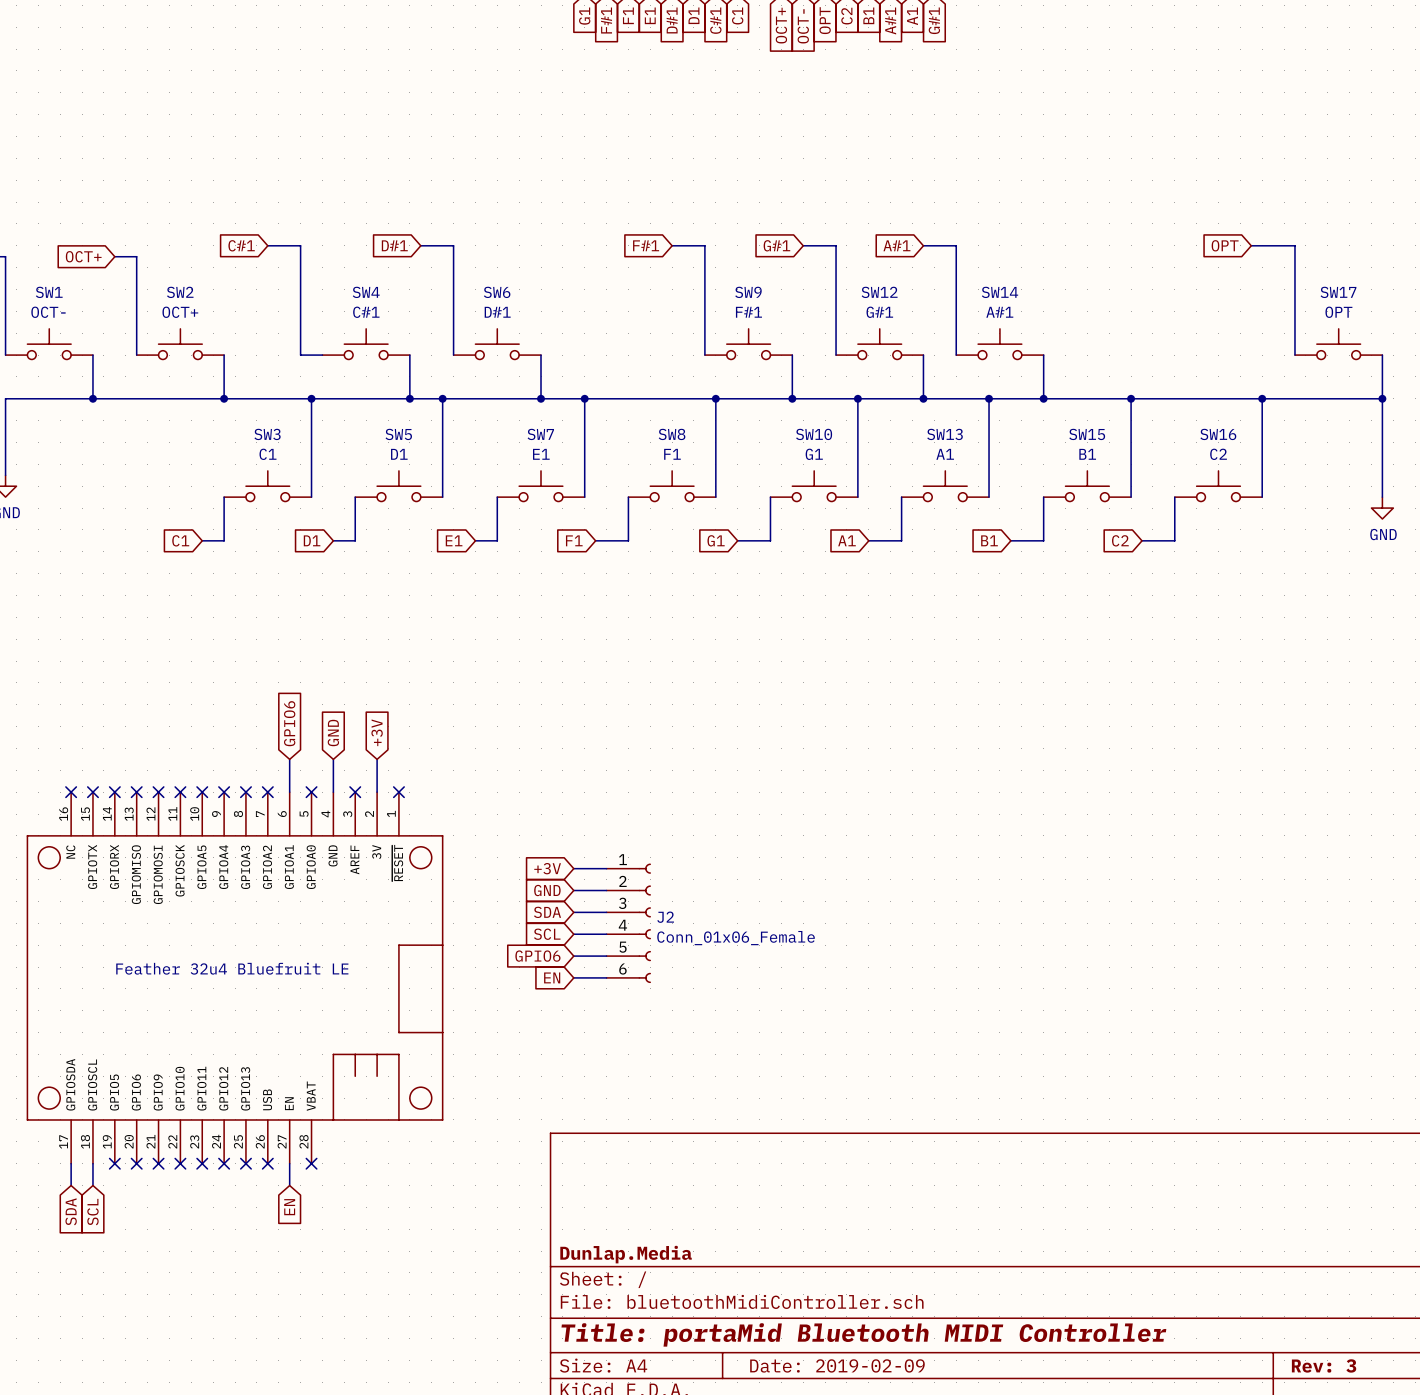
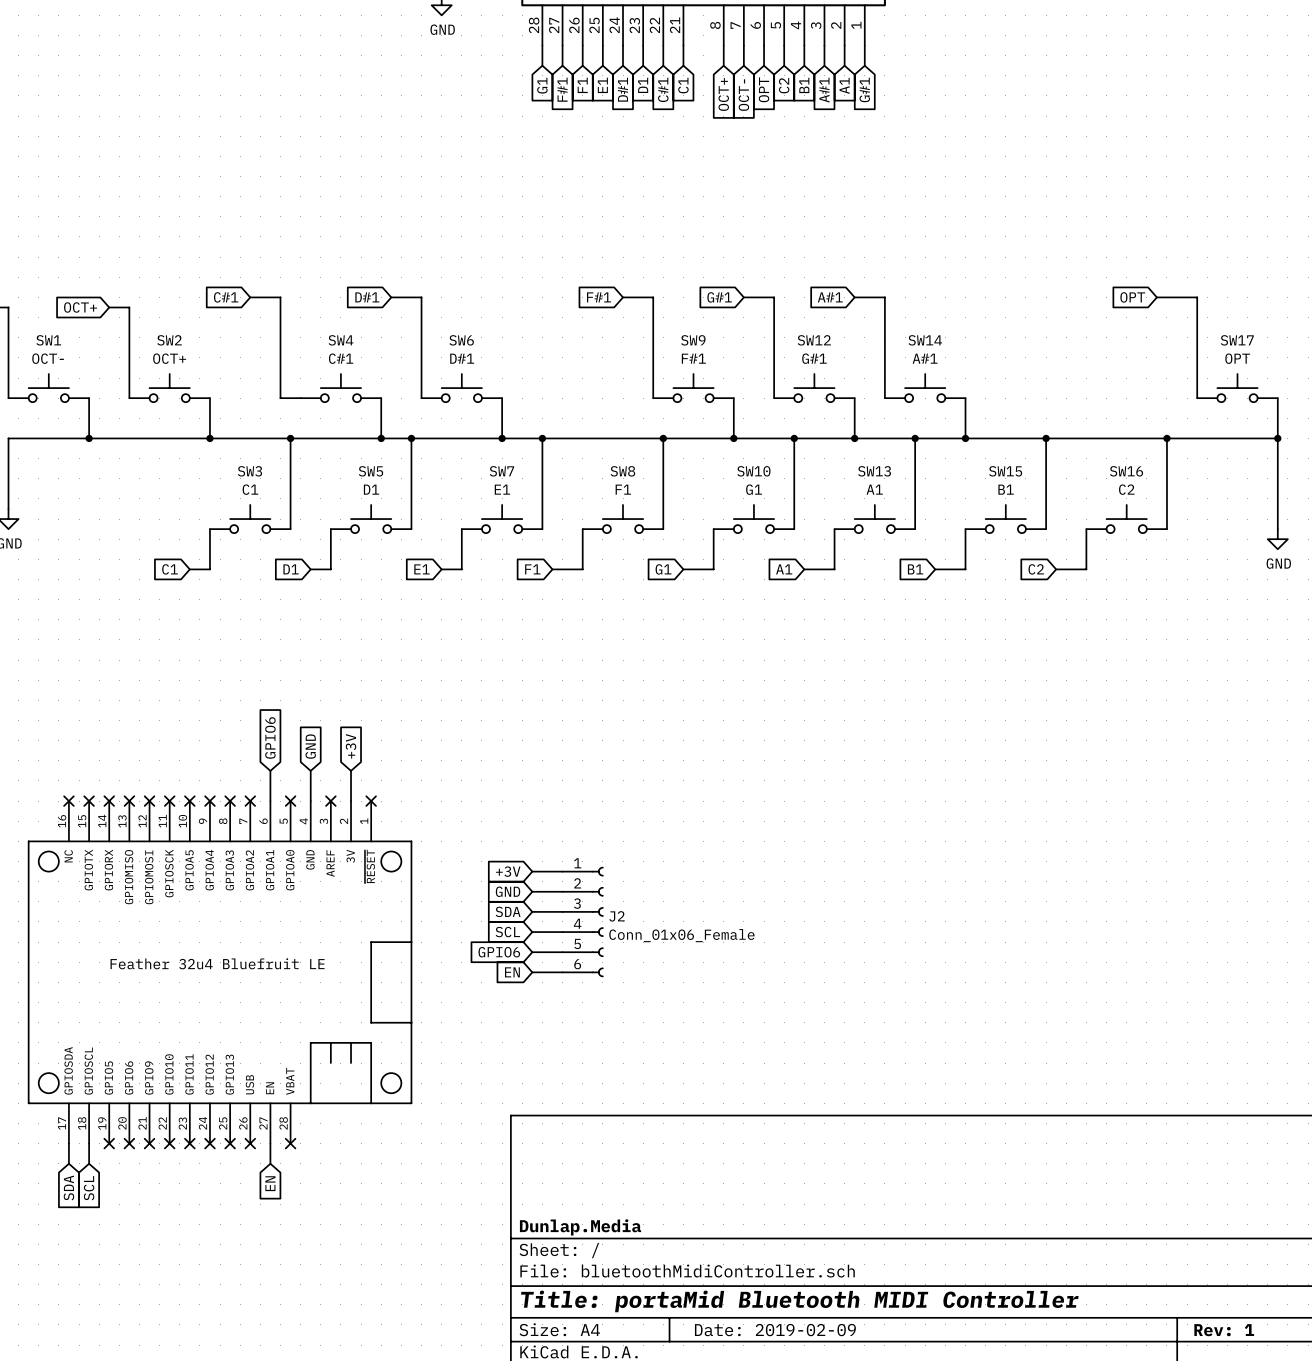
title block: Rev: 3 (1324, 1365) -> Rev: 1 (1224, 1330)

